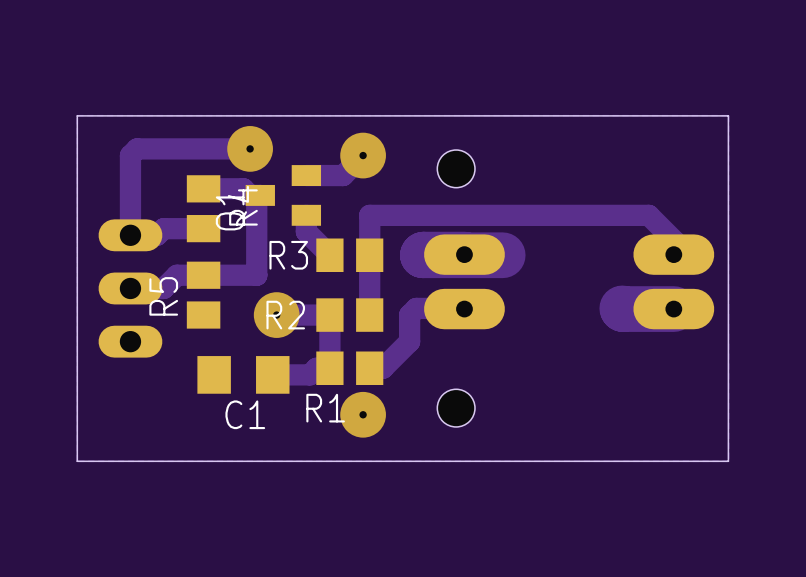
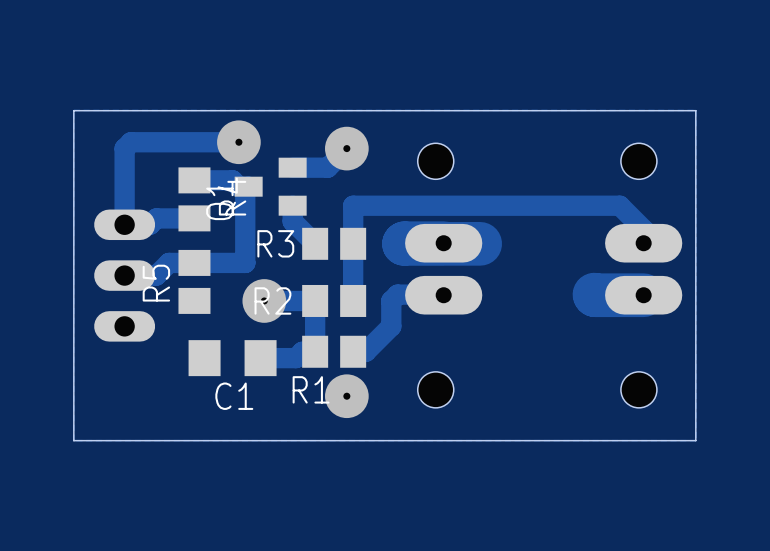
hole: none -> (638, 161)
hole: none -> (638, 389)

